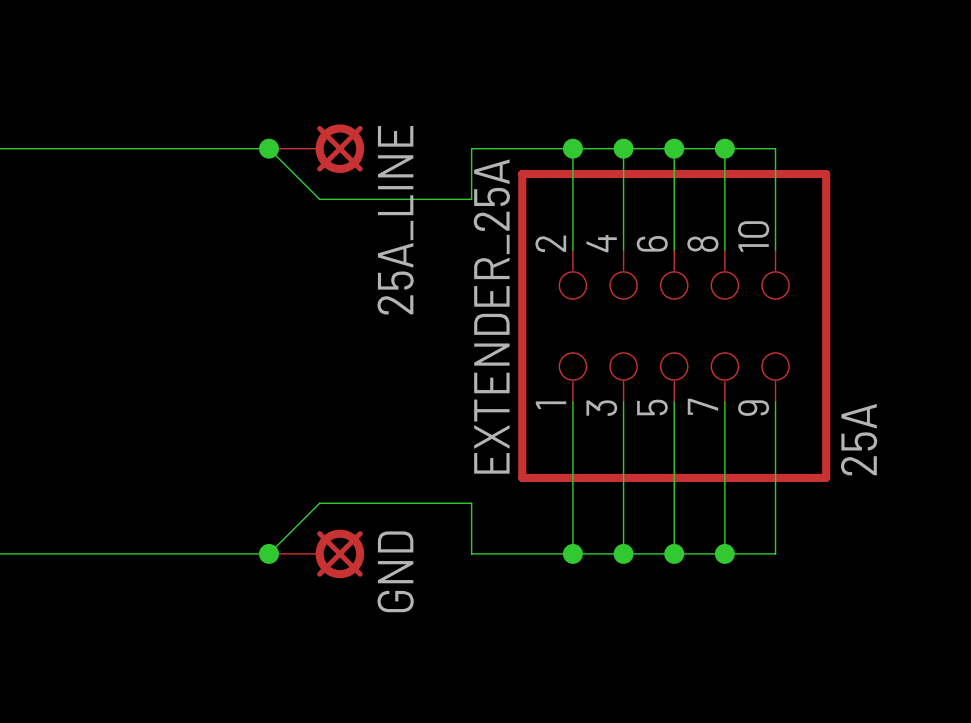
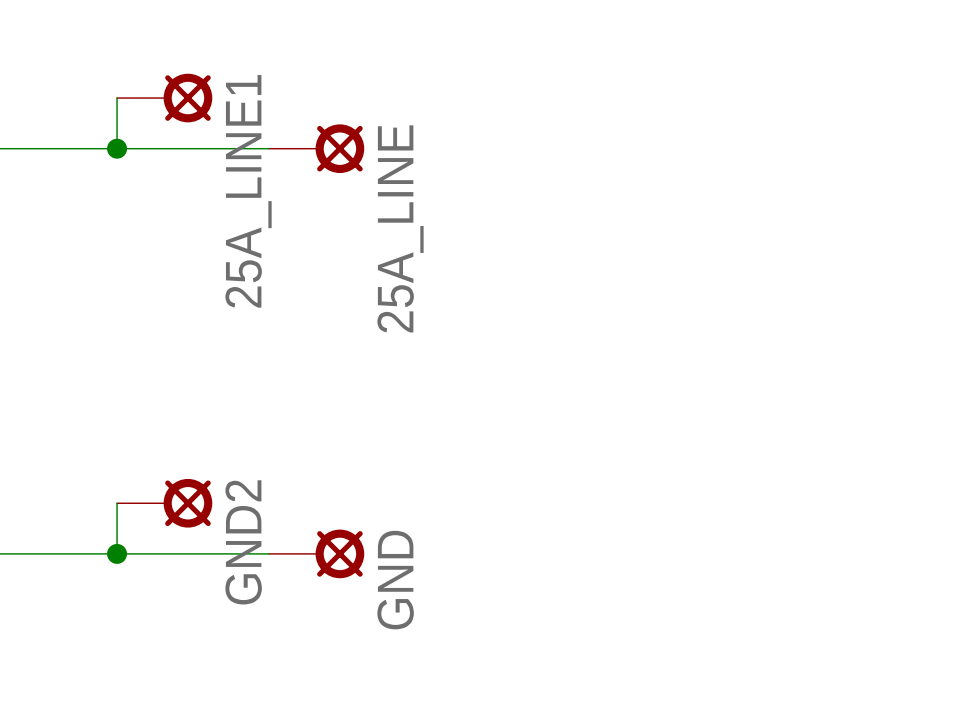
wire: none -> (117, 98) (117, 148)
25A_LINE1: none -> (164, 98)
junction: none -> (117, 148)
wire: (269, 148) (319, 199) (471, 199) (471, 148) (775, 148) (775, 250) -> none
junction: (269, 148) -> none
wire: (572, 148) (572, 250) -> none
junction: (572, 148) -> none
wire: (623, 148) (623, 250) -> none
junction: (623, 148) -> none
wire: (674, 148) (674, 250) -> none
junction: (674, 148) -> none
wire: (724, 148) (724, 250) -> none
junction: (724, 148) -> none
EXTENDER_25A: 25A (674, 325) -> none
wire: (572, 401) (572, 553) -> none
wire: (623, 401) (623, 553) -> none
wire: (674, 401) (674, 553) -> none
wire: (724, 401) (724, 553) -> none
wire: (775, 401) (775, 553) (471, 553) (471, 503) (319, 503) (269, 553) -> none
wire: none -> (117, 503) (117, 553)
GND2: none -> (164, 503)
junction: none -> (117, 553)
junction: (269, 553) -> none
junction: (572, 553) -> none
junction: (623, 553) -> none
junction: (674, 553) -> none
junction: (724, 553) -> none

